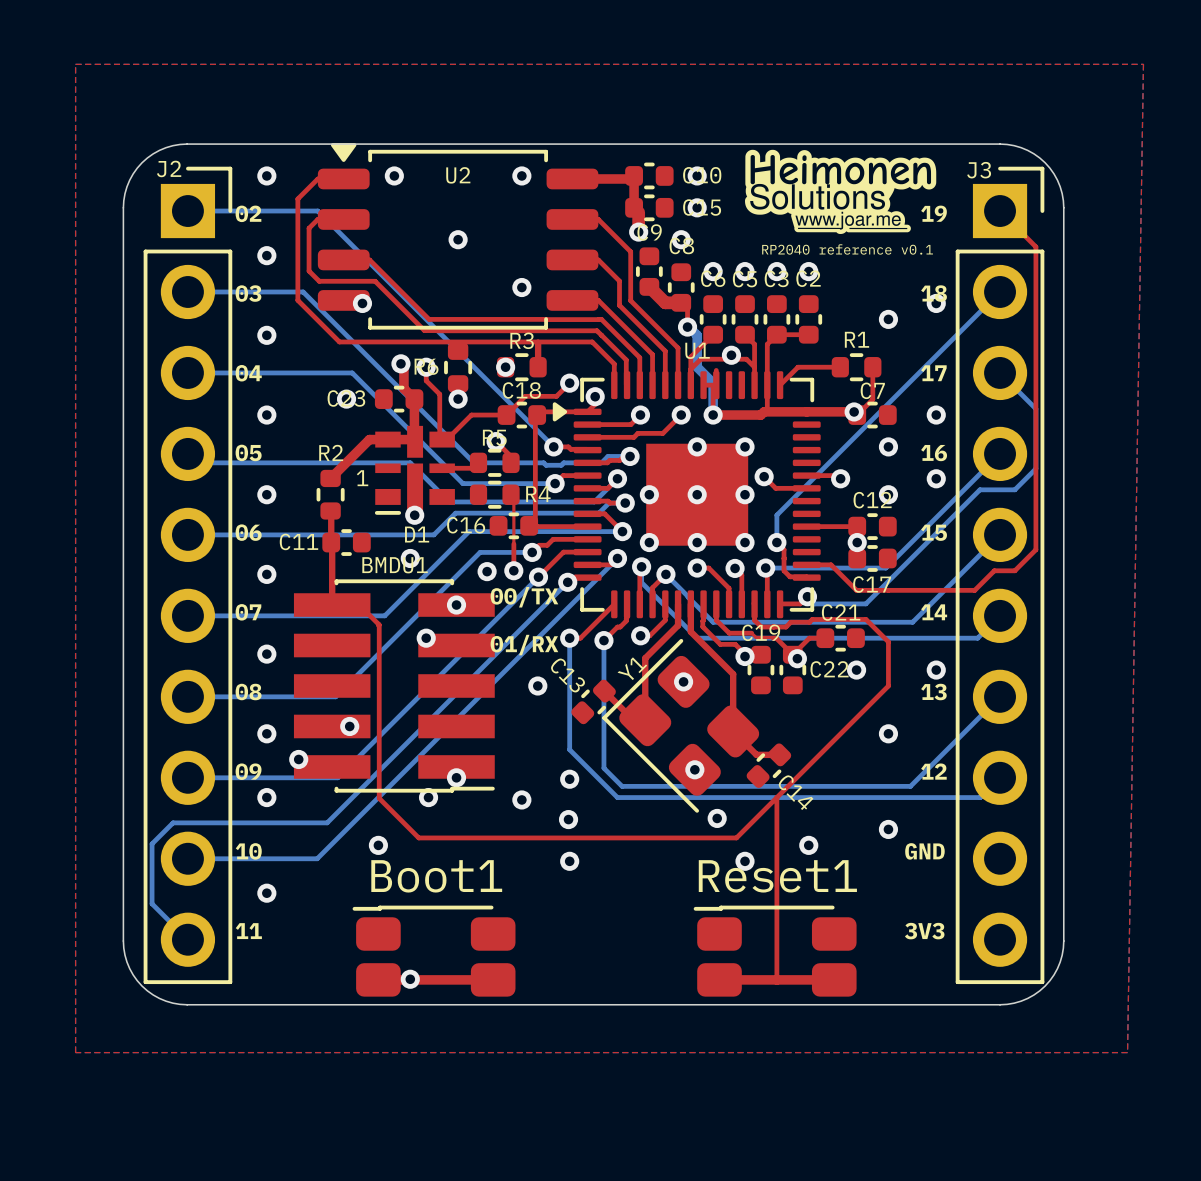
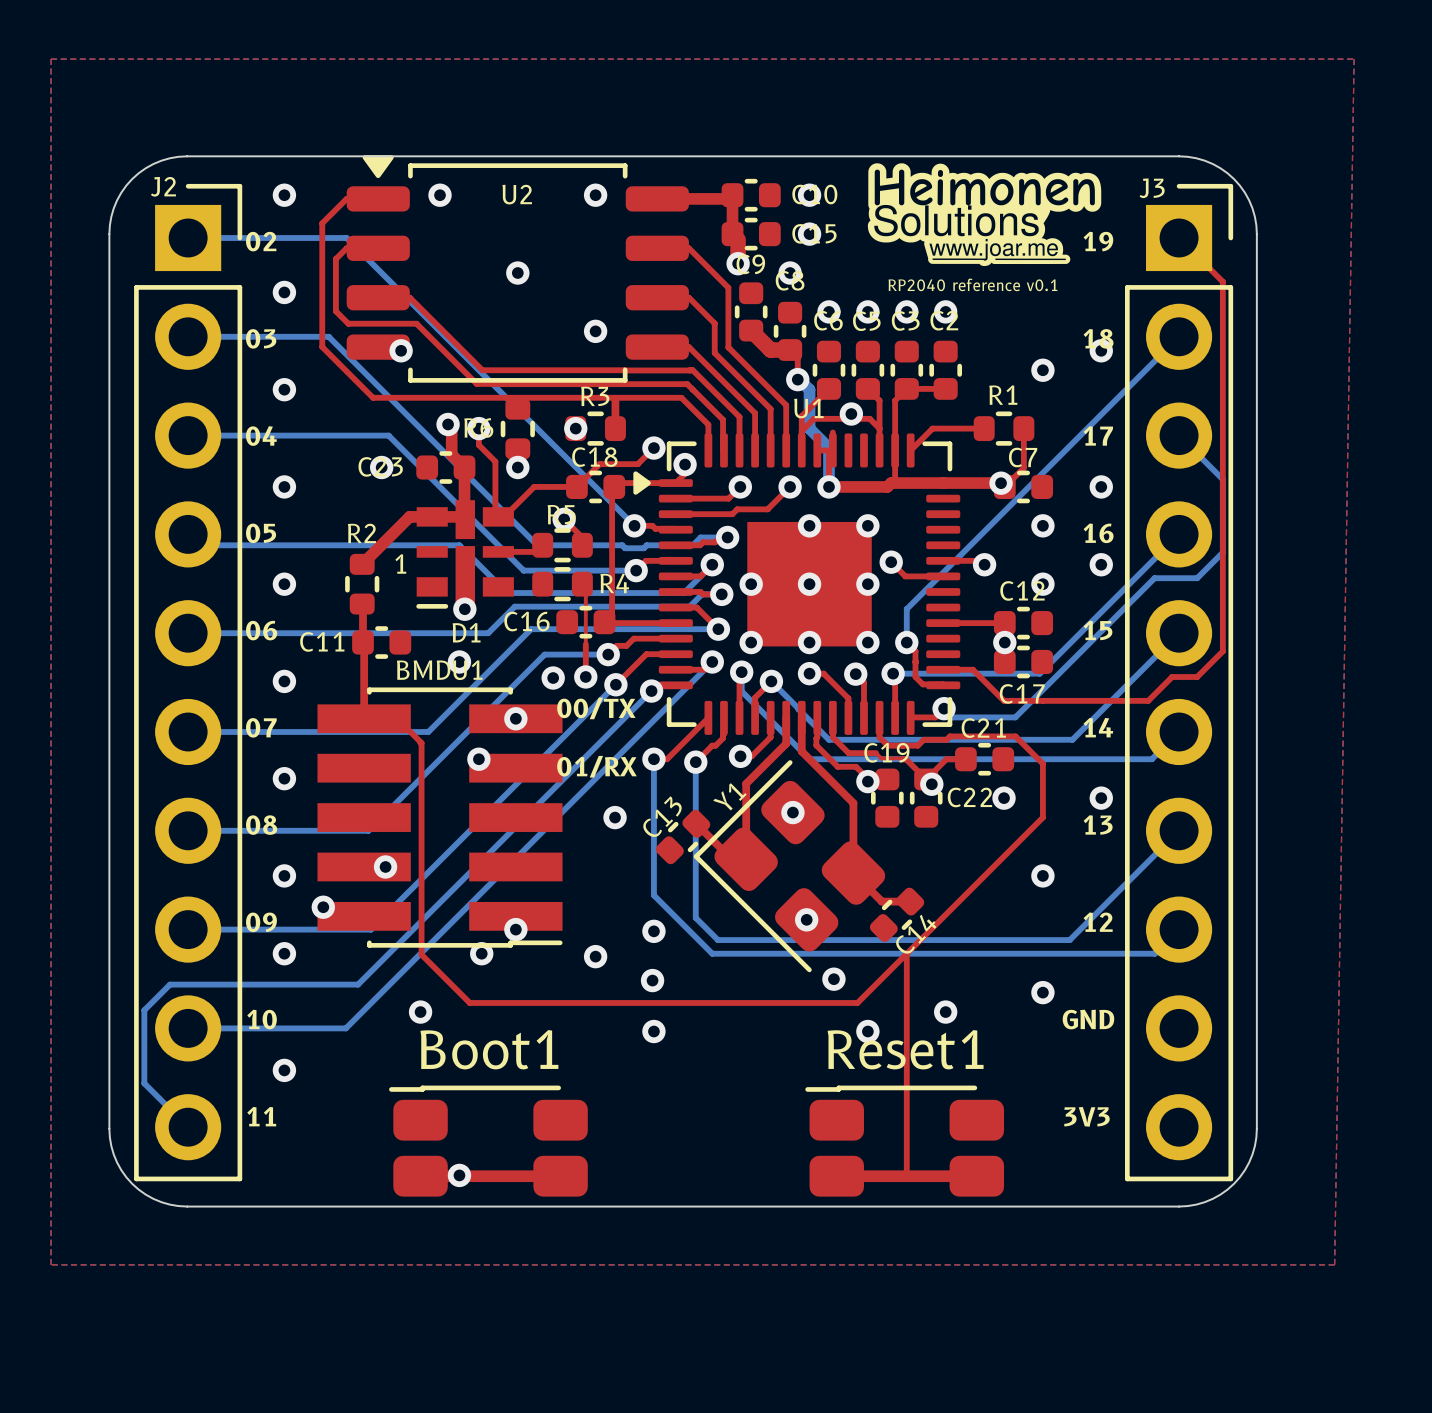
C13 name rotation: 0° (567, 675) -> 90° counterclockwise (662, 816)
C14 name rotation: 0° (795, 792) -> 90° counterclockwise (916, 934)

